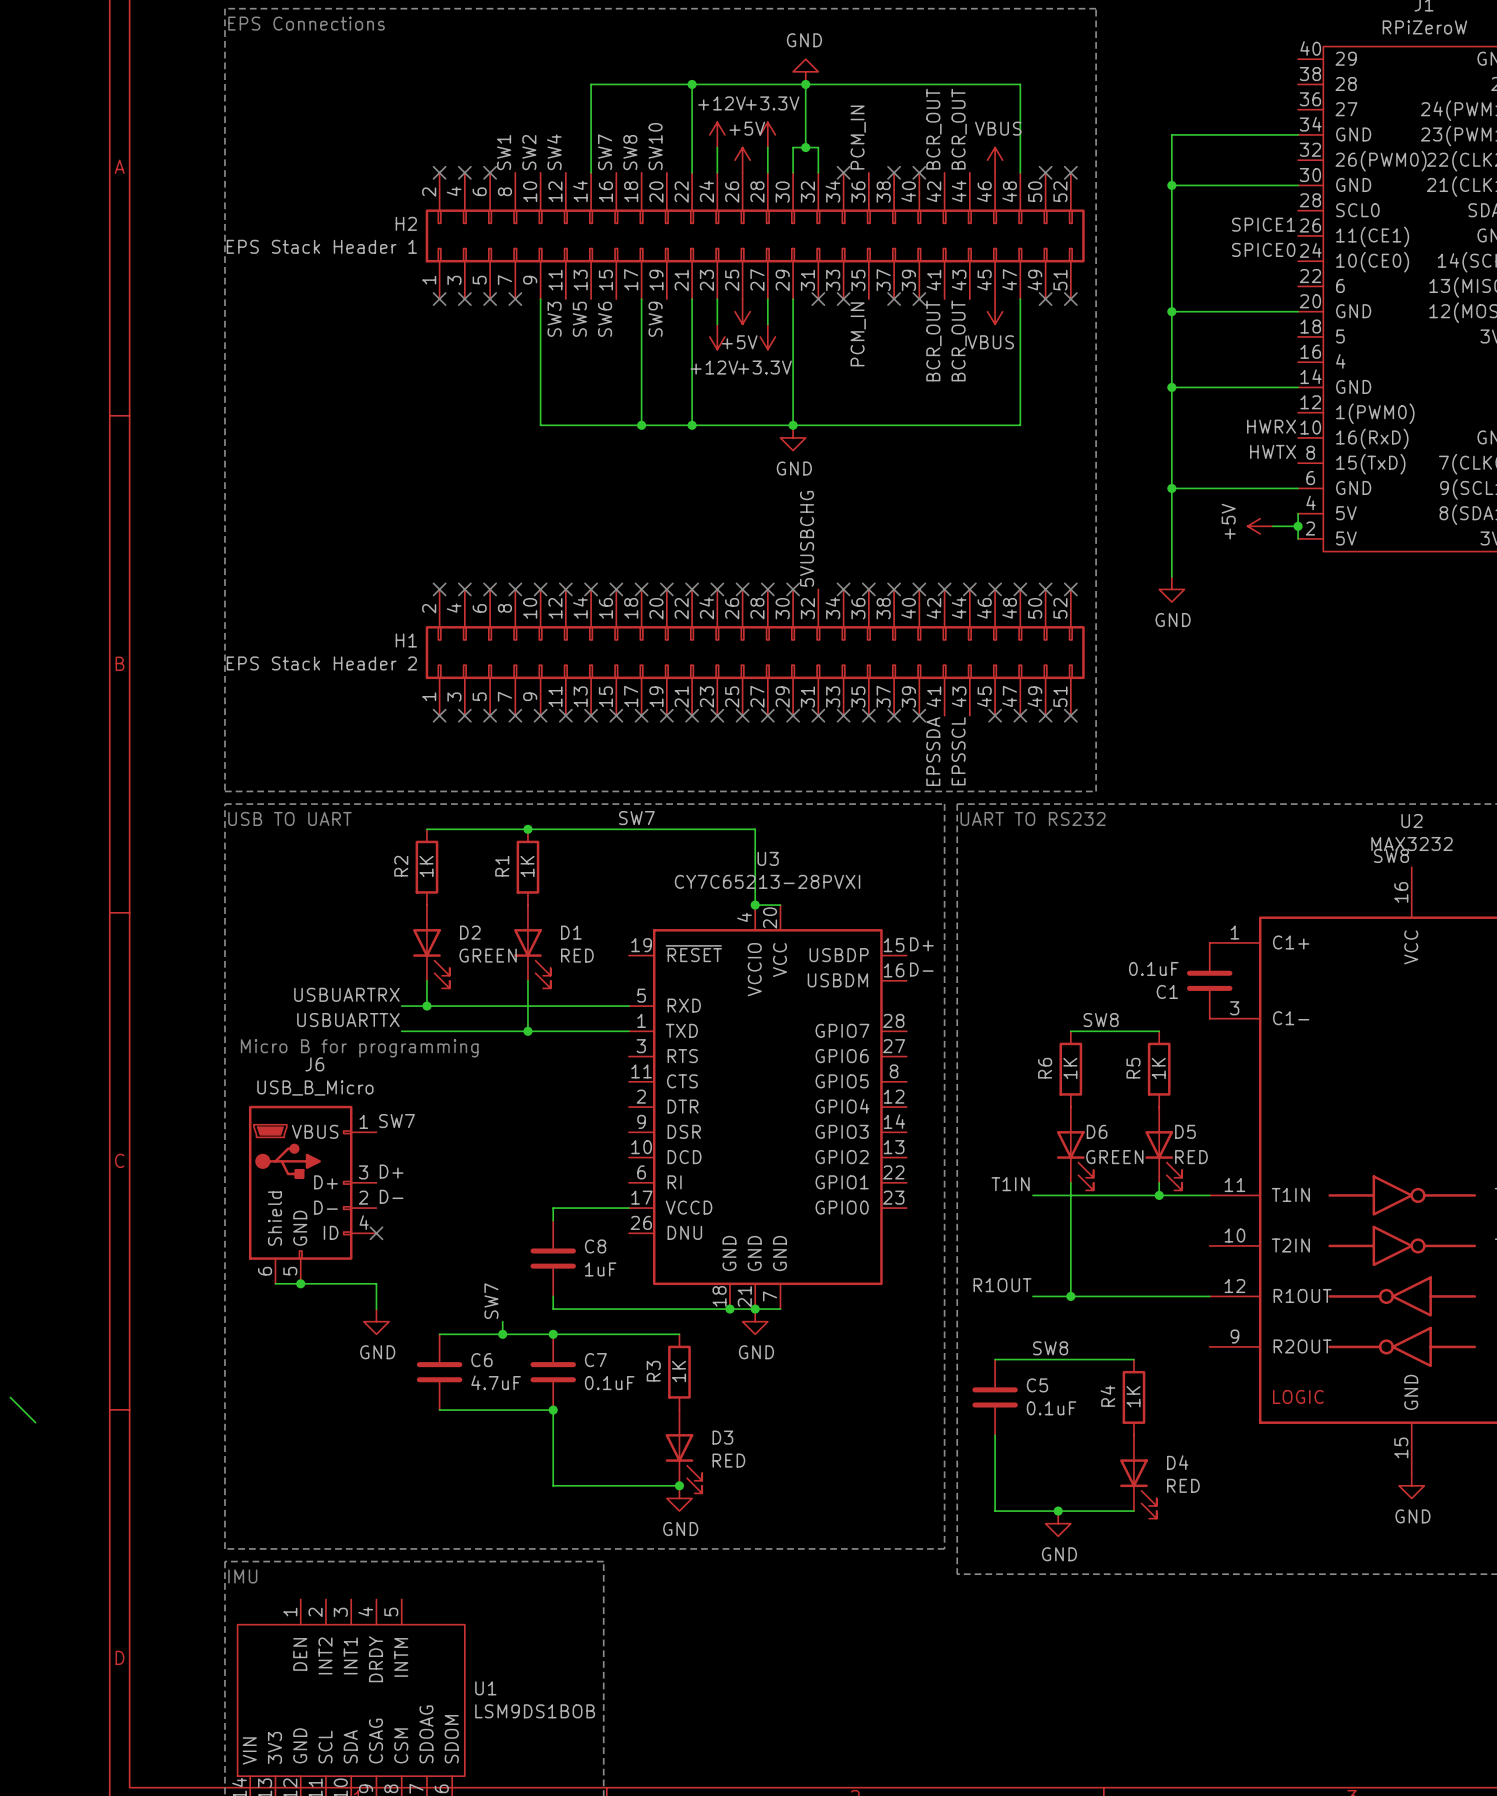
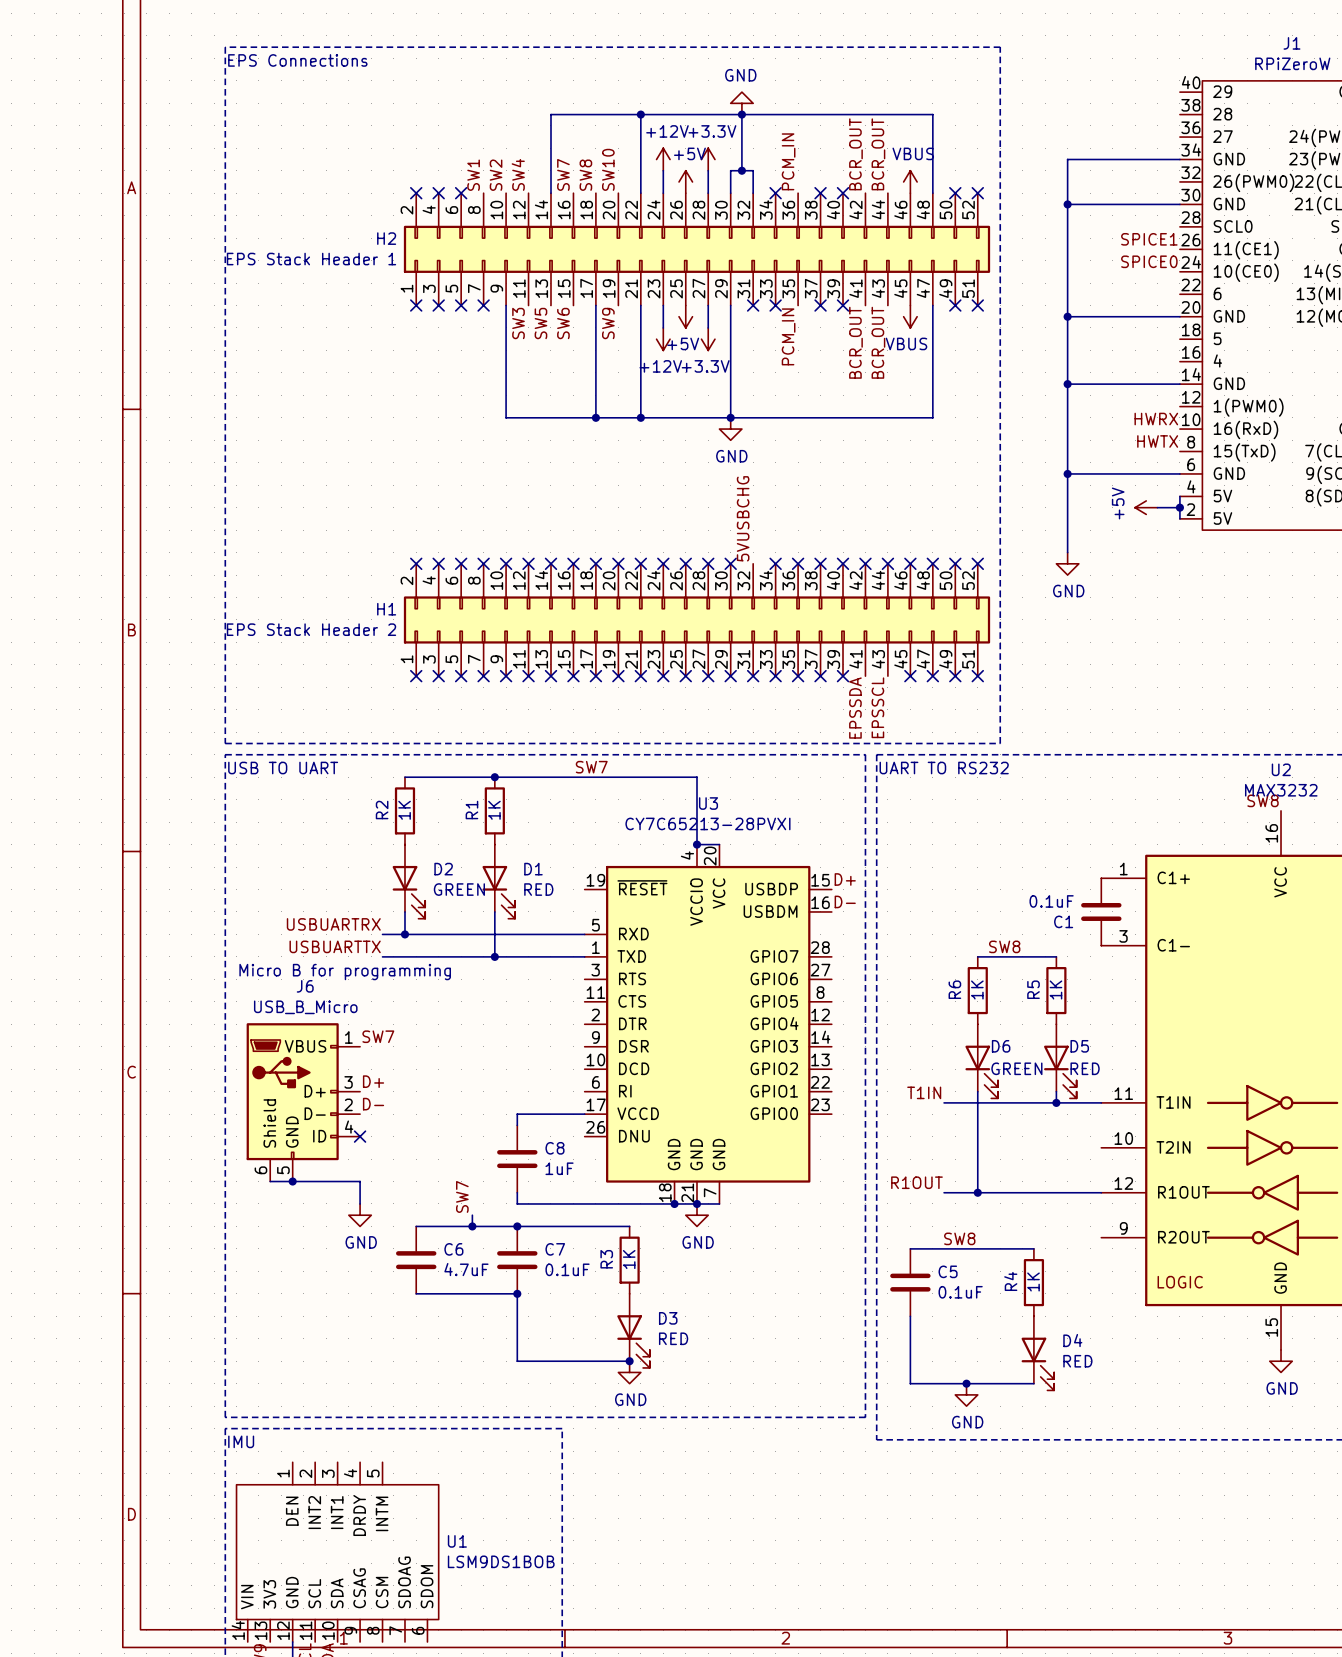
wire: (10, 1397) (35, 1422) -> none

